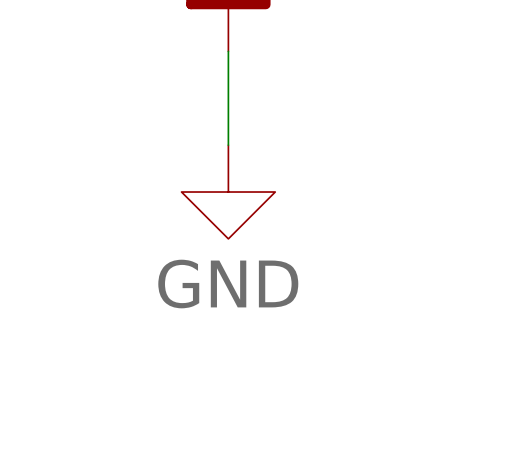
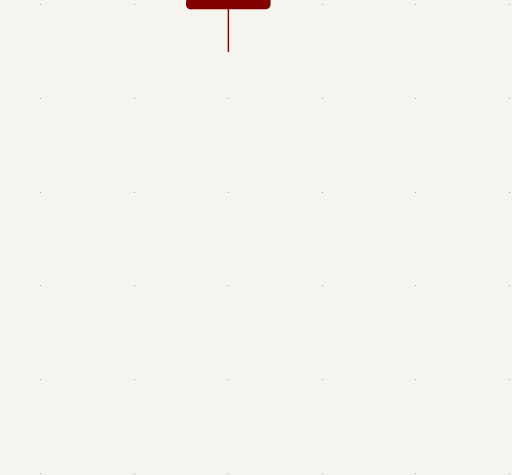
wire: (228, 51) (228, 145) -> none
power symbol: GND (228, 192) -> none

